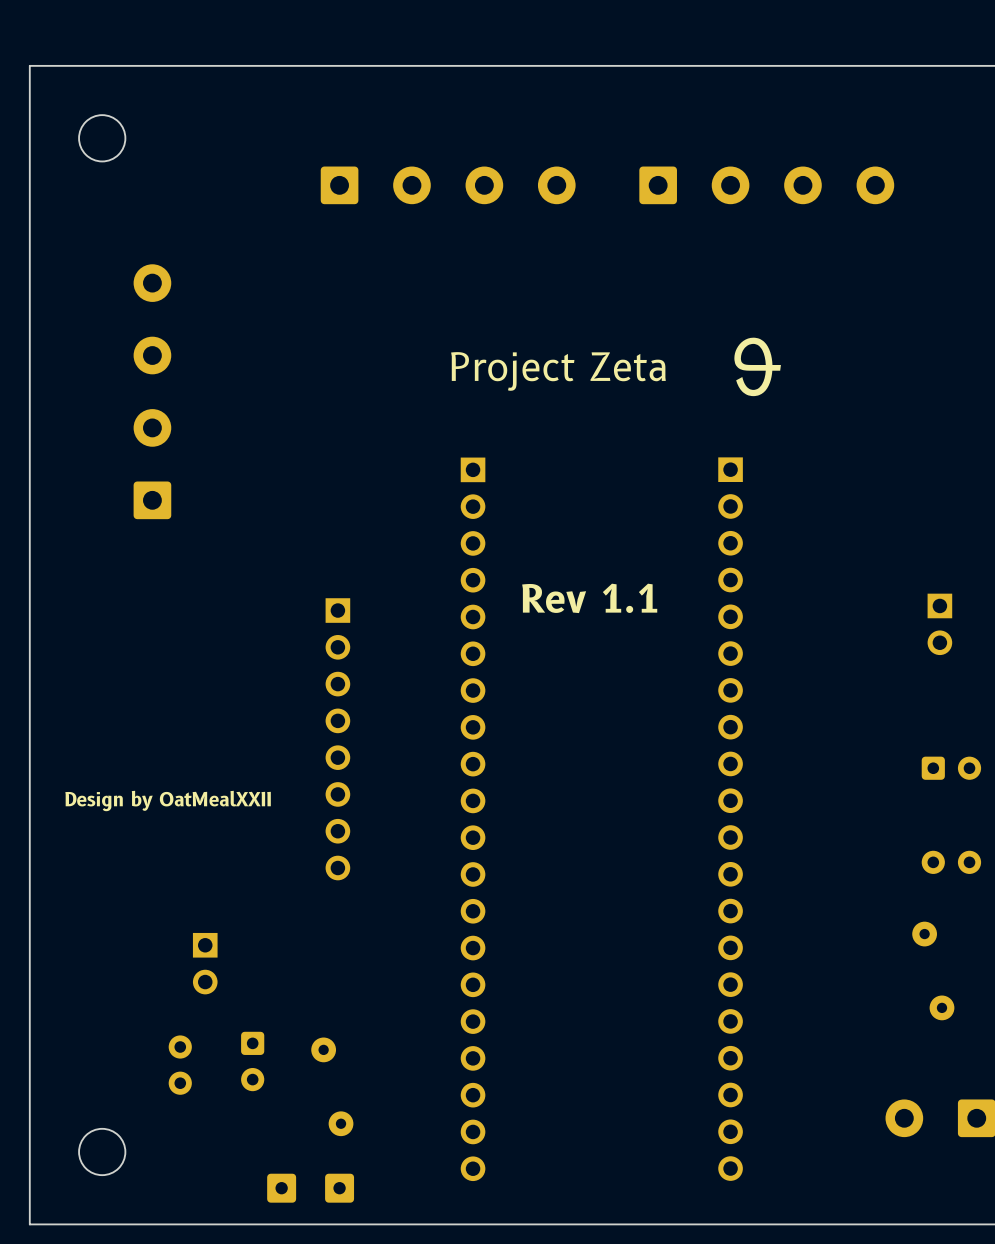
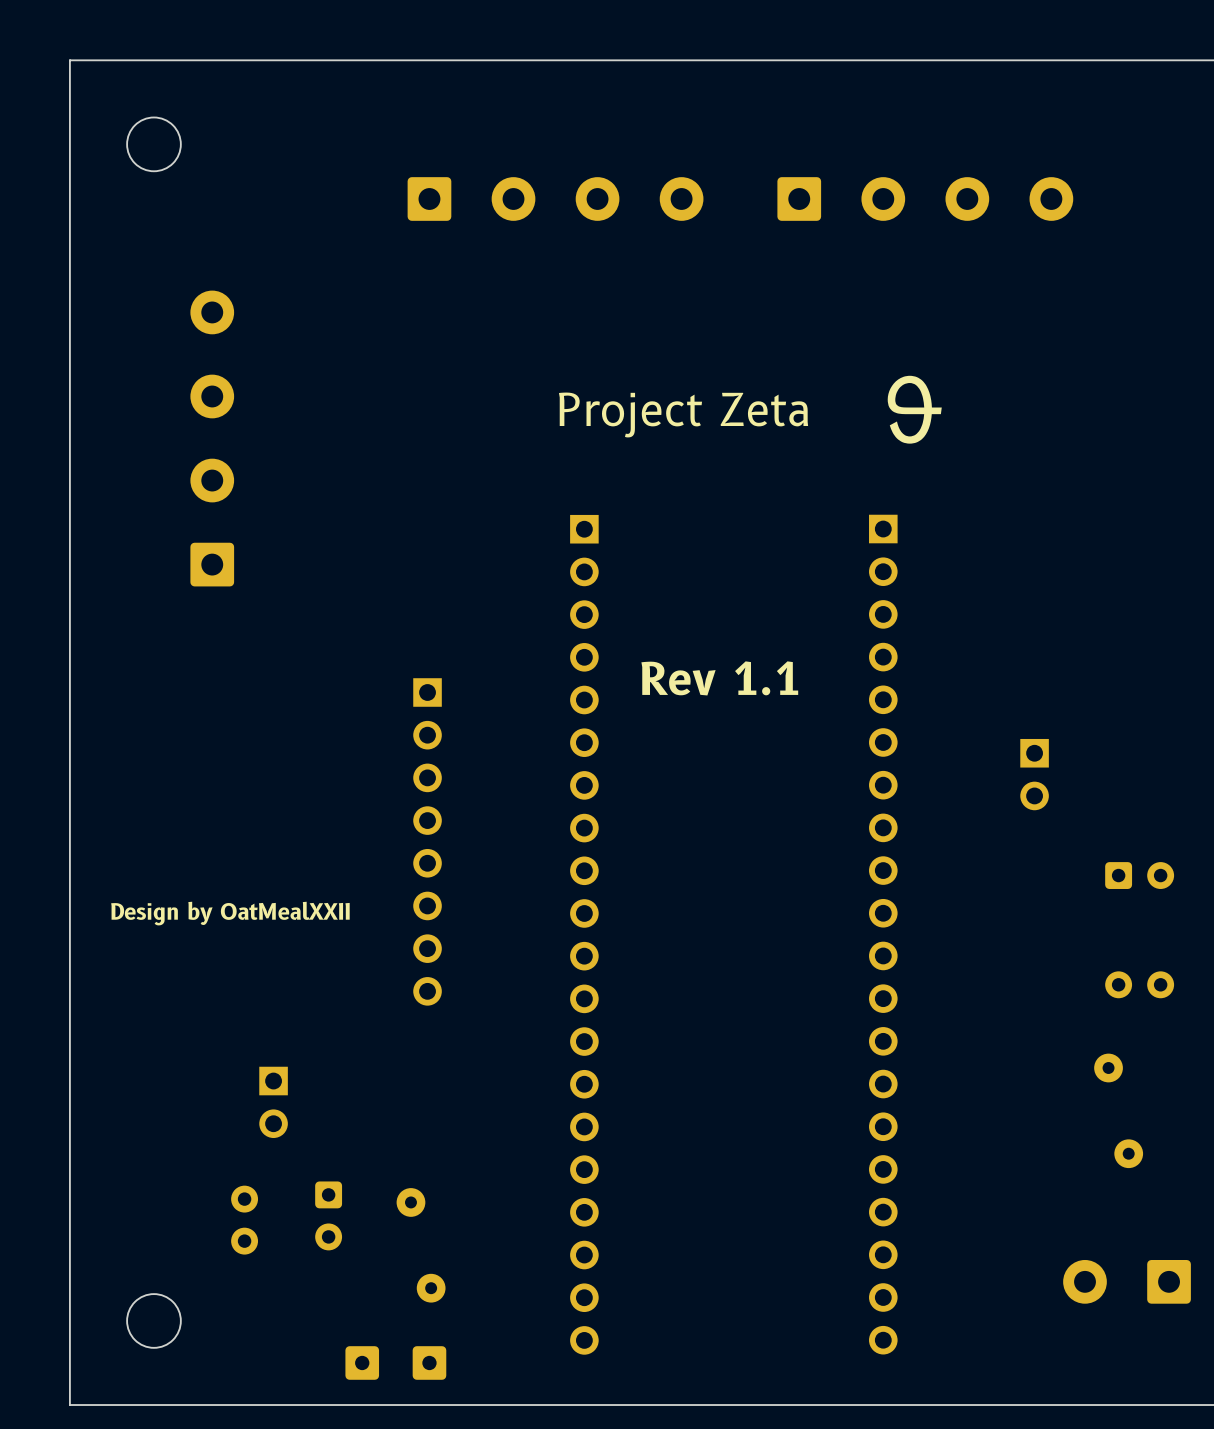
part position: (939, 624) -> (1034, 774)

